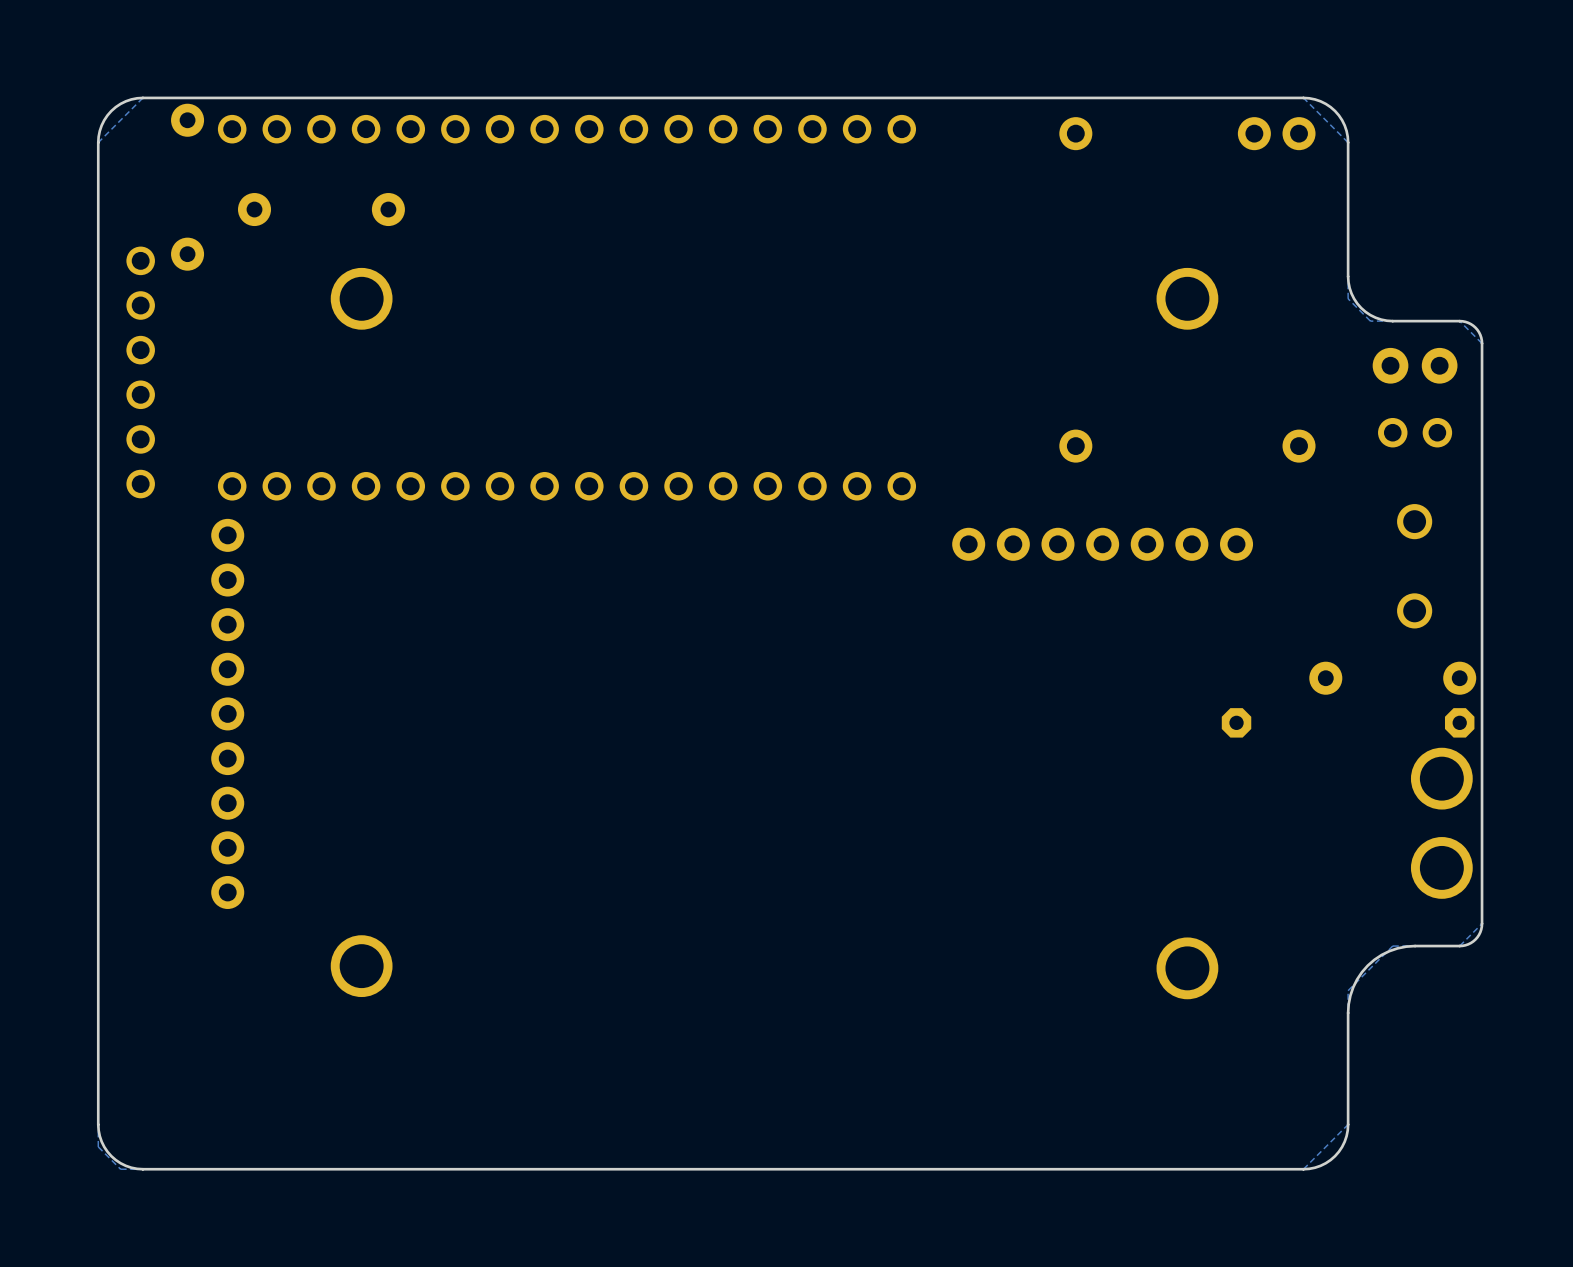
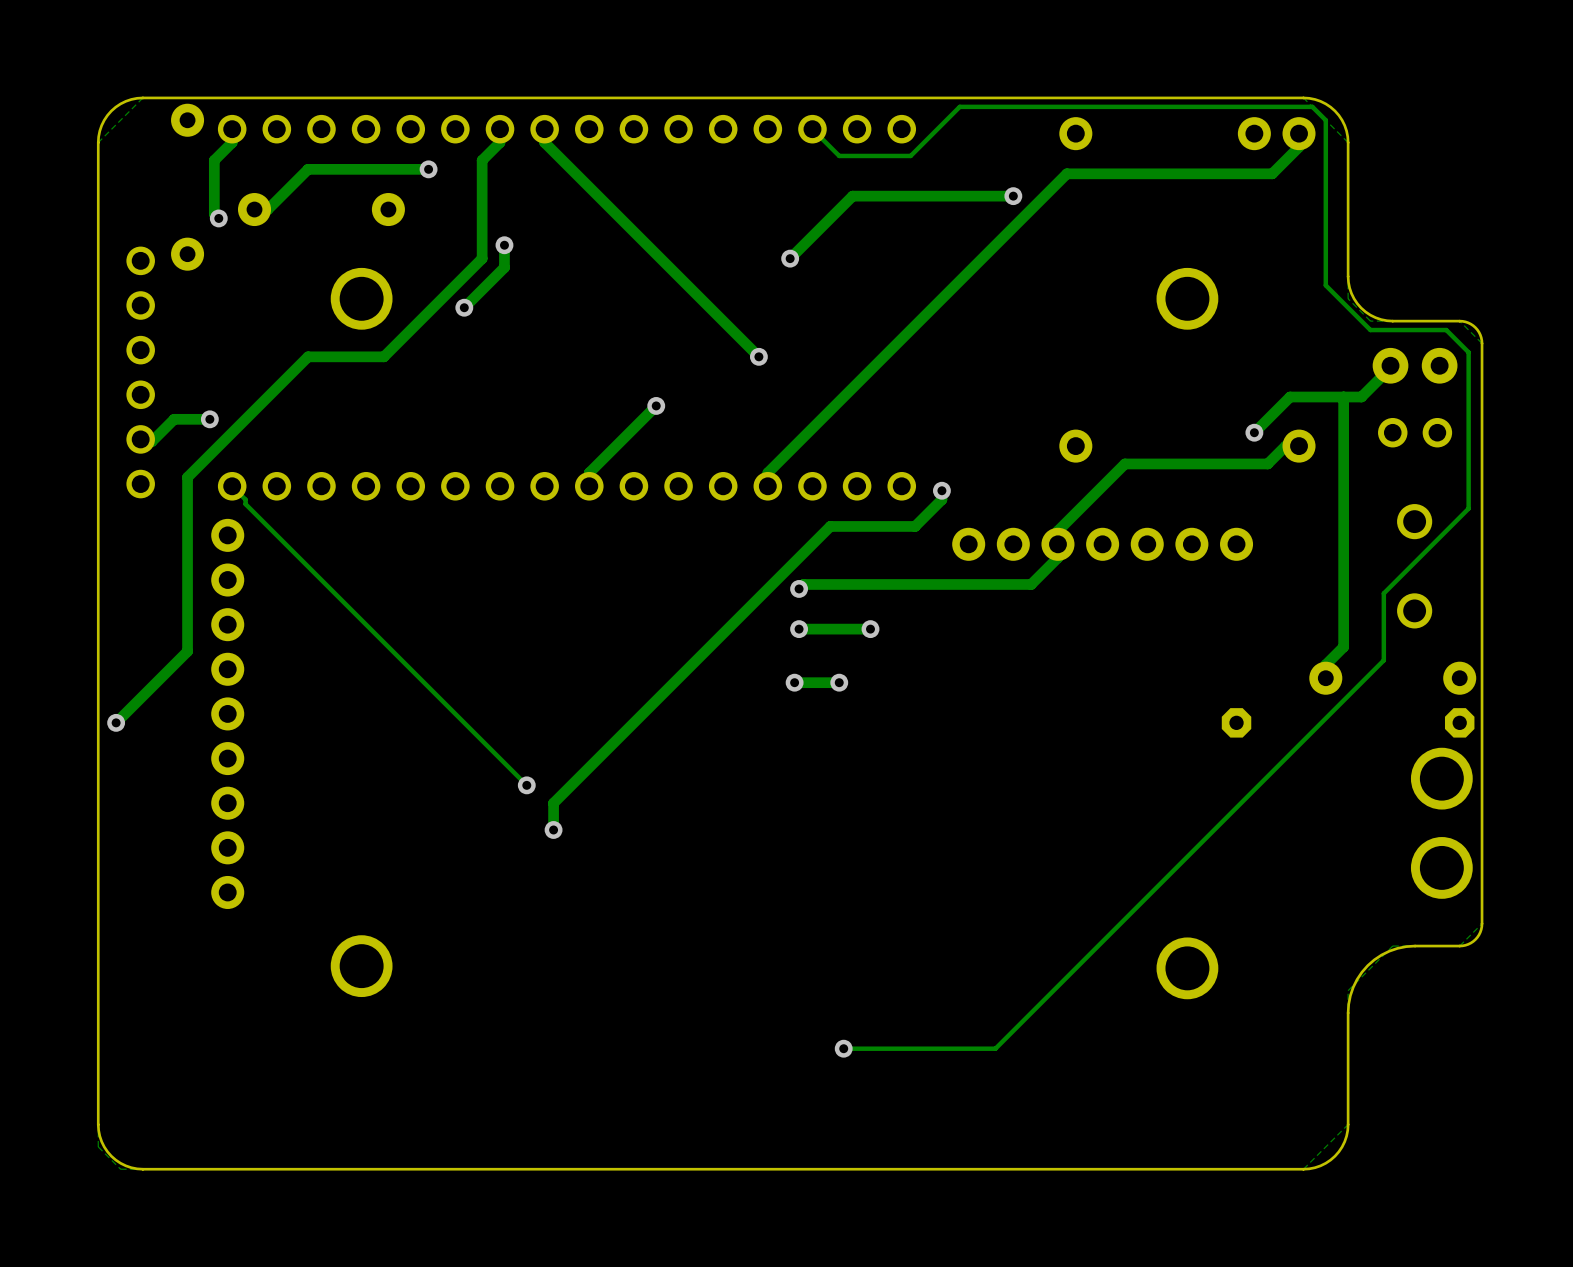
track: none -> (232, 129) (232, 142) (214, 160) (214, 213) (218, 218)
track: none -> (500, 129) (500, 142) (482, 160) (482, 258) (383, 356) (308, 356) (187, 477) (187, 651) (116, 722)
track: none -> (544, 129) (544, 142) (758, 356)
track: none -> (812, 129) (839, 155) (910, 155) (959, 106) (1312, 106) (1325, 120) (1325, 285) (1370, 330) (1446, 330) (1468, 352) (1468, 508) (1383, 593) (1383, 660) (995, 1048) (843, 1048)
track: none -> (1299, 133) (1299, 147) (1272, 173) (1066, 173) (767, 472) (767, 486)
track: none -> (428, 169) (308, 169) (267, 209) (254, 209)
via: none -> (428, 169)
track: none -> (1013, 196) (852, 196) (790, 258)
via: none -> (1013, 196)
via: none -> (218, 218)
track: none -> (504, 245) (504, 267) (464, 307)
via: none -> (504, 245)
via: none -> (790, 258)
via: none -> (464, 307)
via: none -> (758, 356)
track: none -> (1390, 365) (1392, 365) (1361, 397) (1290, 397) (1254, 432)
track: none -> (1343, 397) (1343, 646) (1325, 664) (1325, 678)
track: none -> (656, 405) (589, 472) (589, 486)
via: none -> (656, 405)
track: none -> (209, 419) (174, 419) (151, 441) (142, 441) (140, 439)
via: none -> (209, 419)
via: none -> (1254, 432)
track: none -> (1299, 446) (1285, 446) (1267, 463) (1124, 463) (1057, 530) (1057, 557) (1031, 584) (803, 584) (799, 588)
track: none -> (232, 486) (245, 499) (245, 504) (526, 785)
track: none -> (941, 490) (941, 499) (915, 526) (830, 526) (553, 803) (553, 829)
via: none -> (941, 490)
via: none -> (799, 588)
via: none -> (799, 629)
track: none -> (870, 629) (799, 629)
via: none -> (870, 629)
via: none -> (794, 682)
track: none -> (839, 682) (794, 682)
via: none -> (839, 682)
via: none -> (116, 722)
via: none -> (526, 785)
via: none -> (553, 829)
via: none -> (843, 1048)

